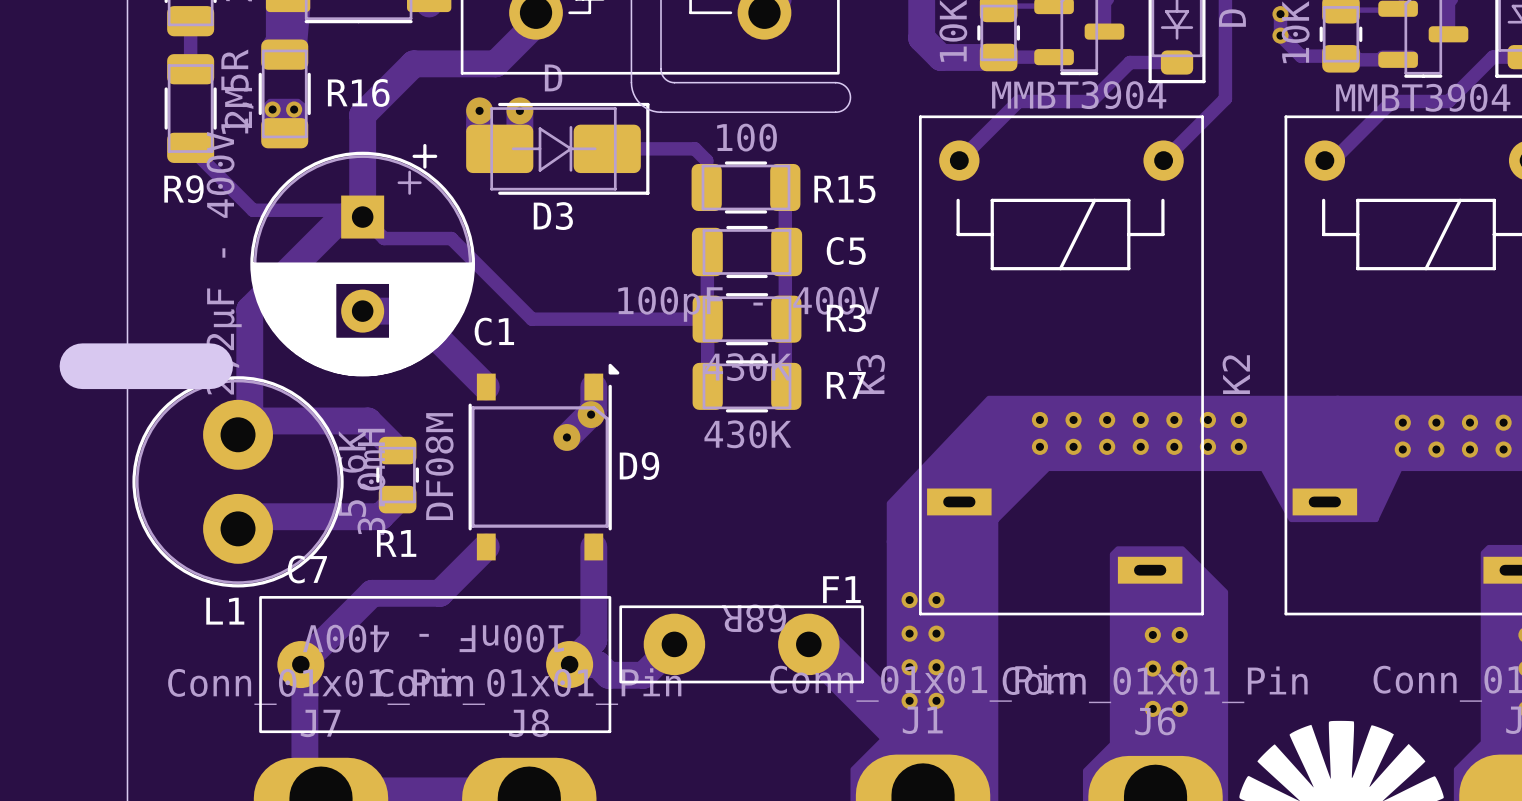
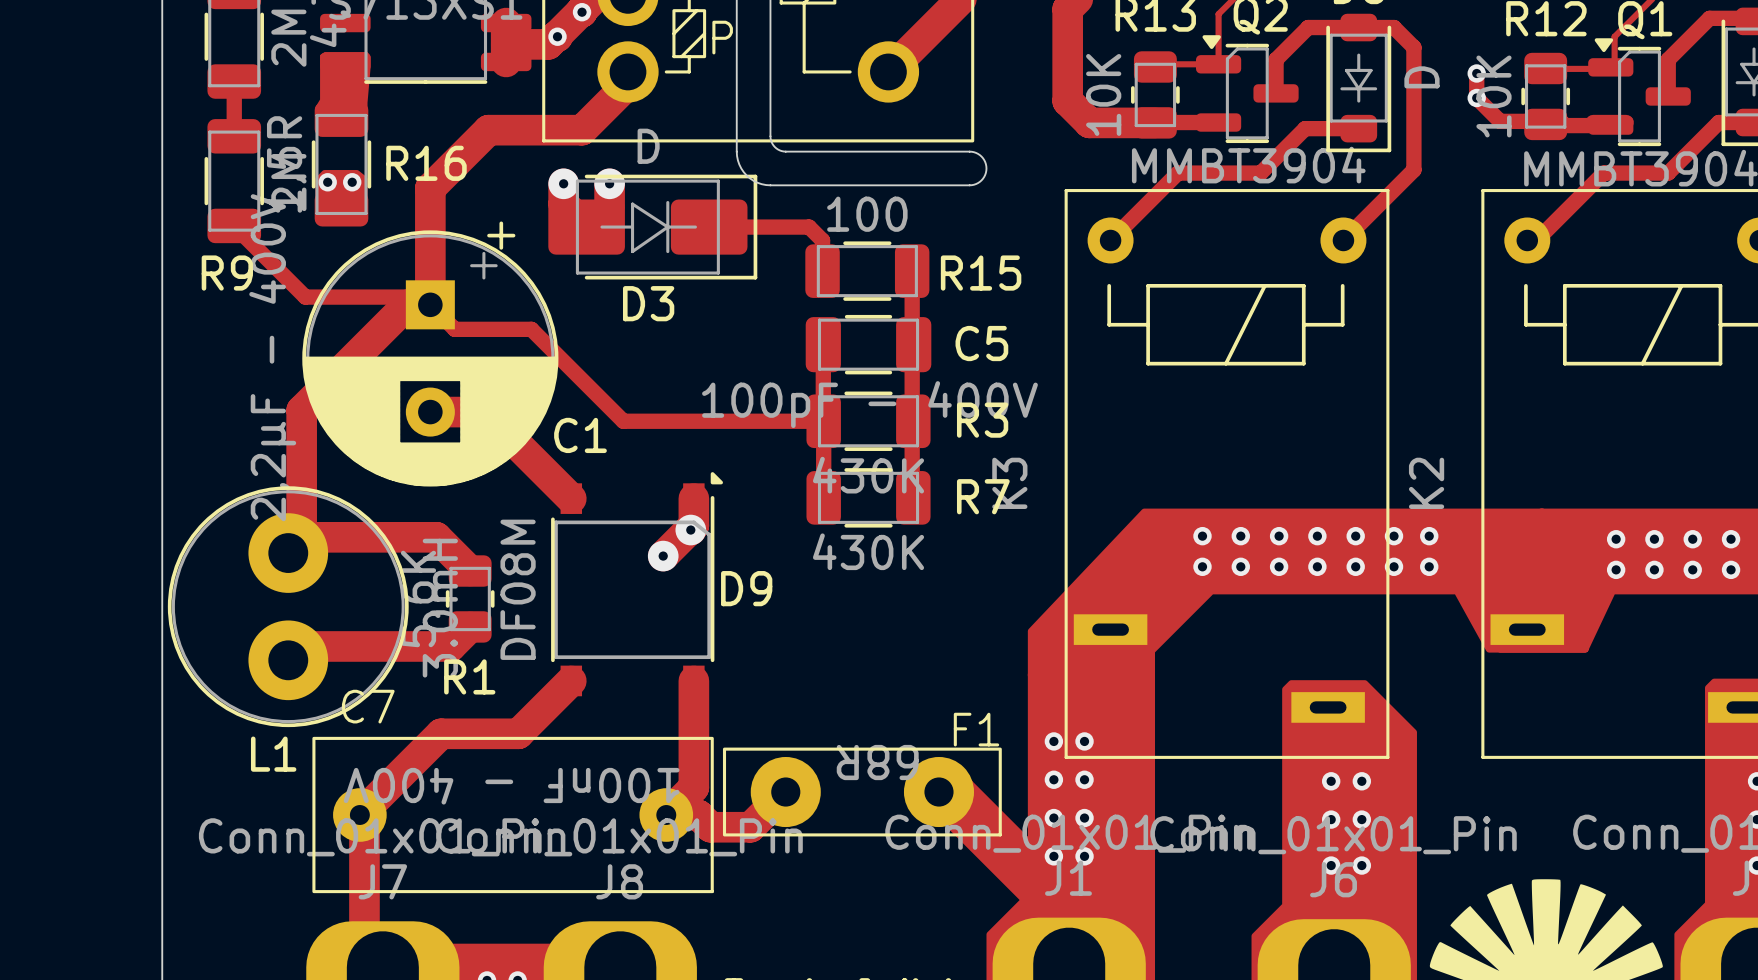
board edge: (82, 366) (210, 366) -> none

